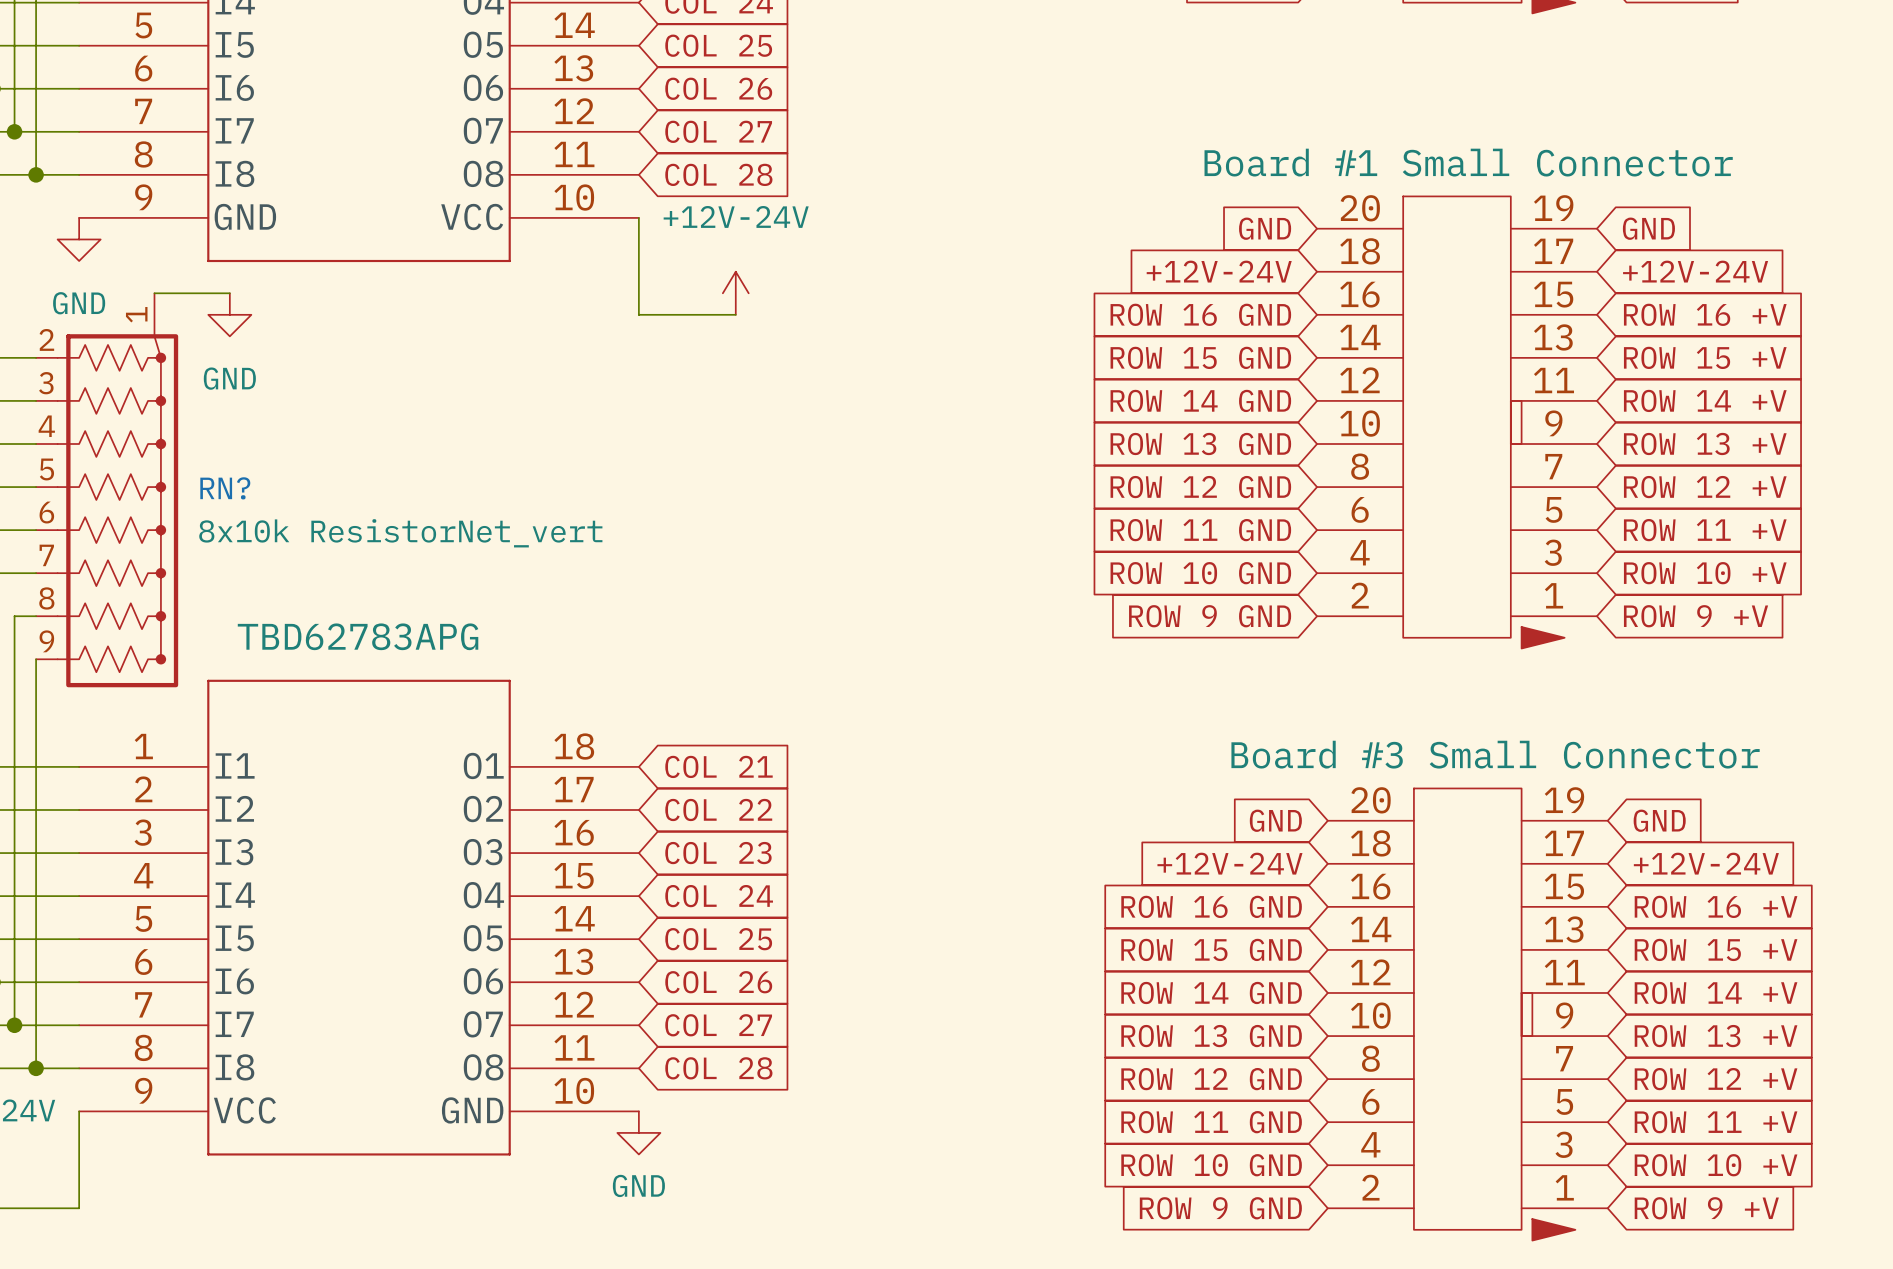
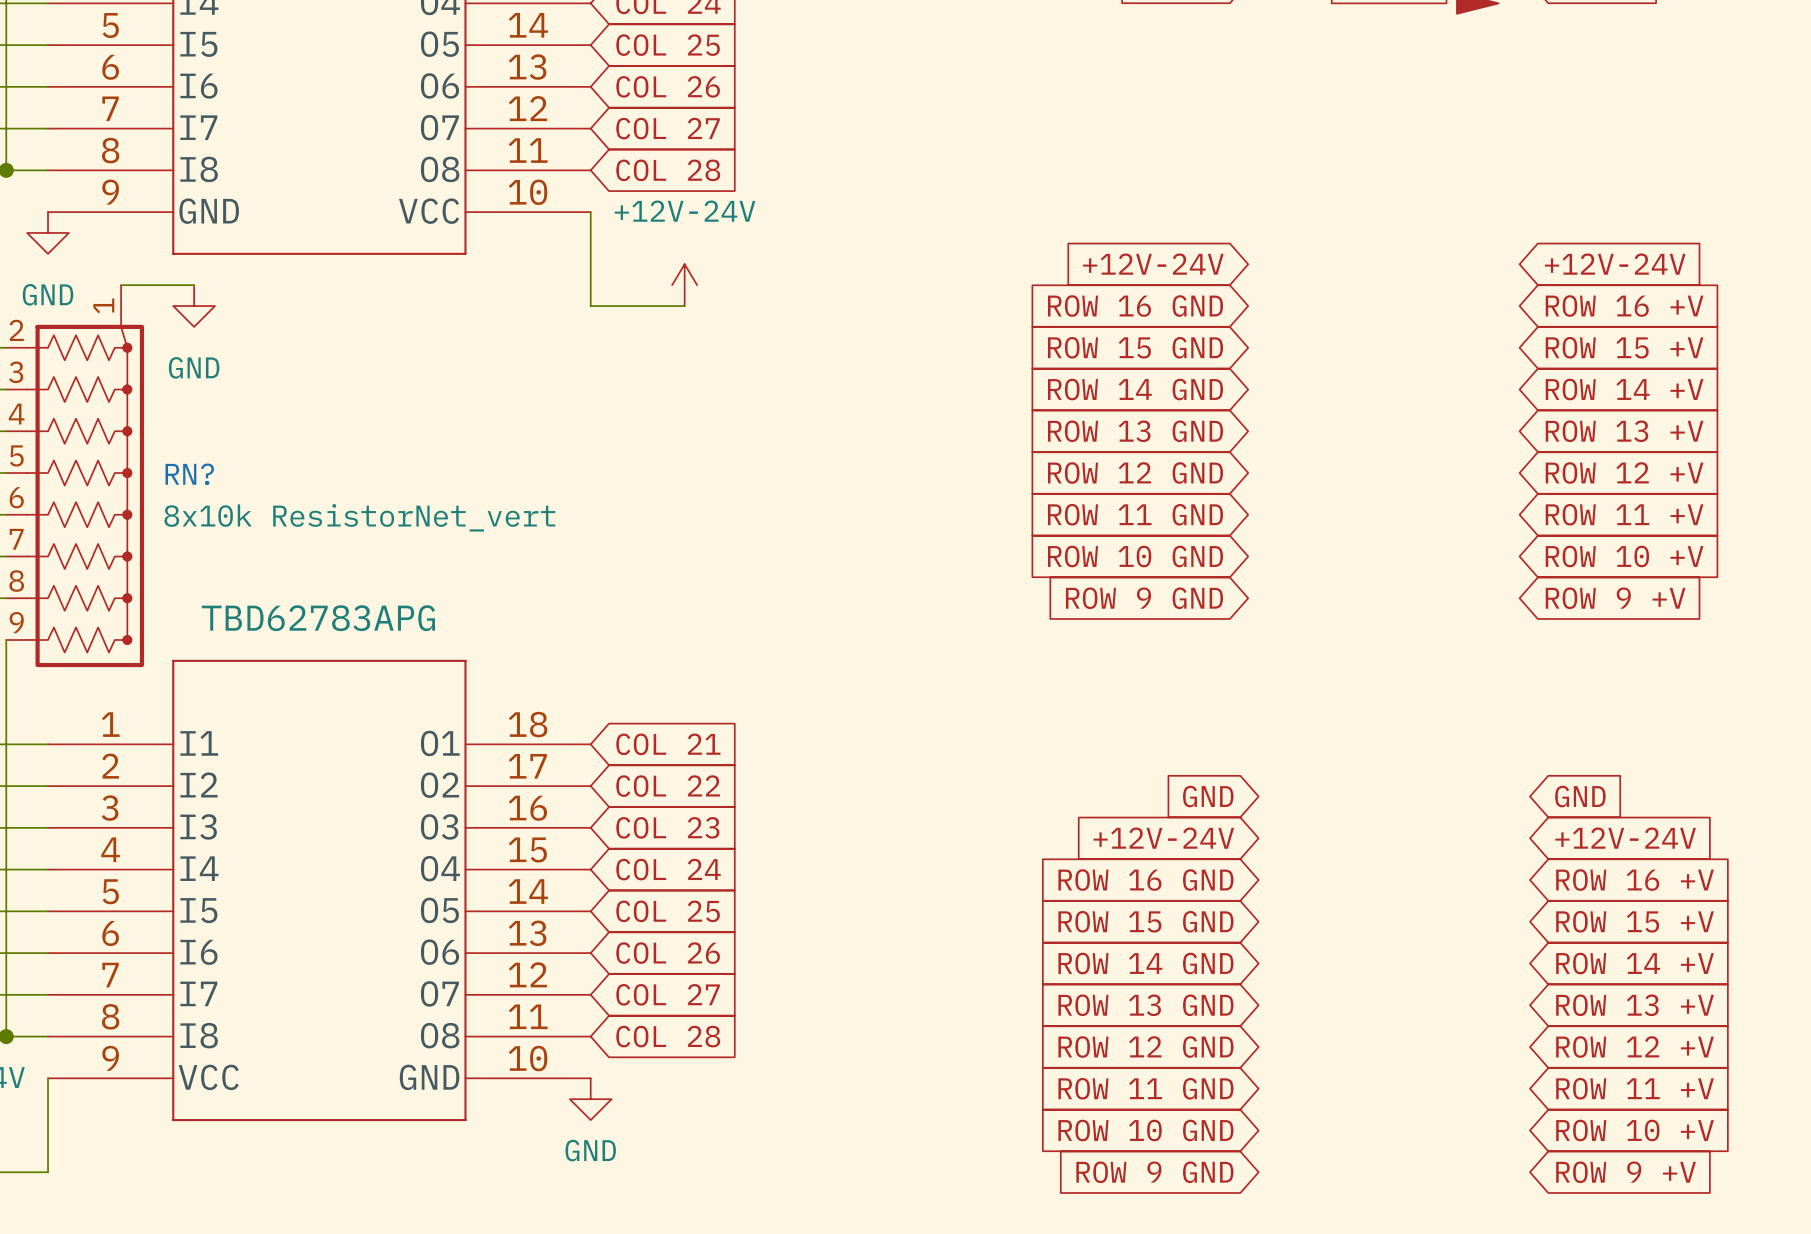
global label: GND (1265, 228) -> none
global label: GND (1648, 228) -> none
part: Board #1 Small Connector (1457, 422) -> none
part: Board #3 Small Connector (1467, 1014) -> none

